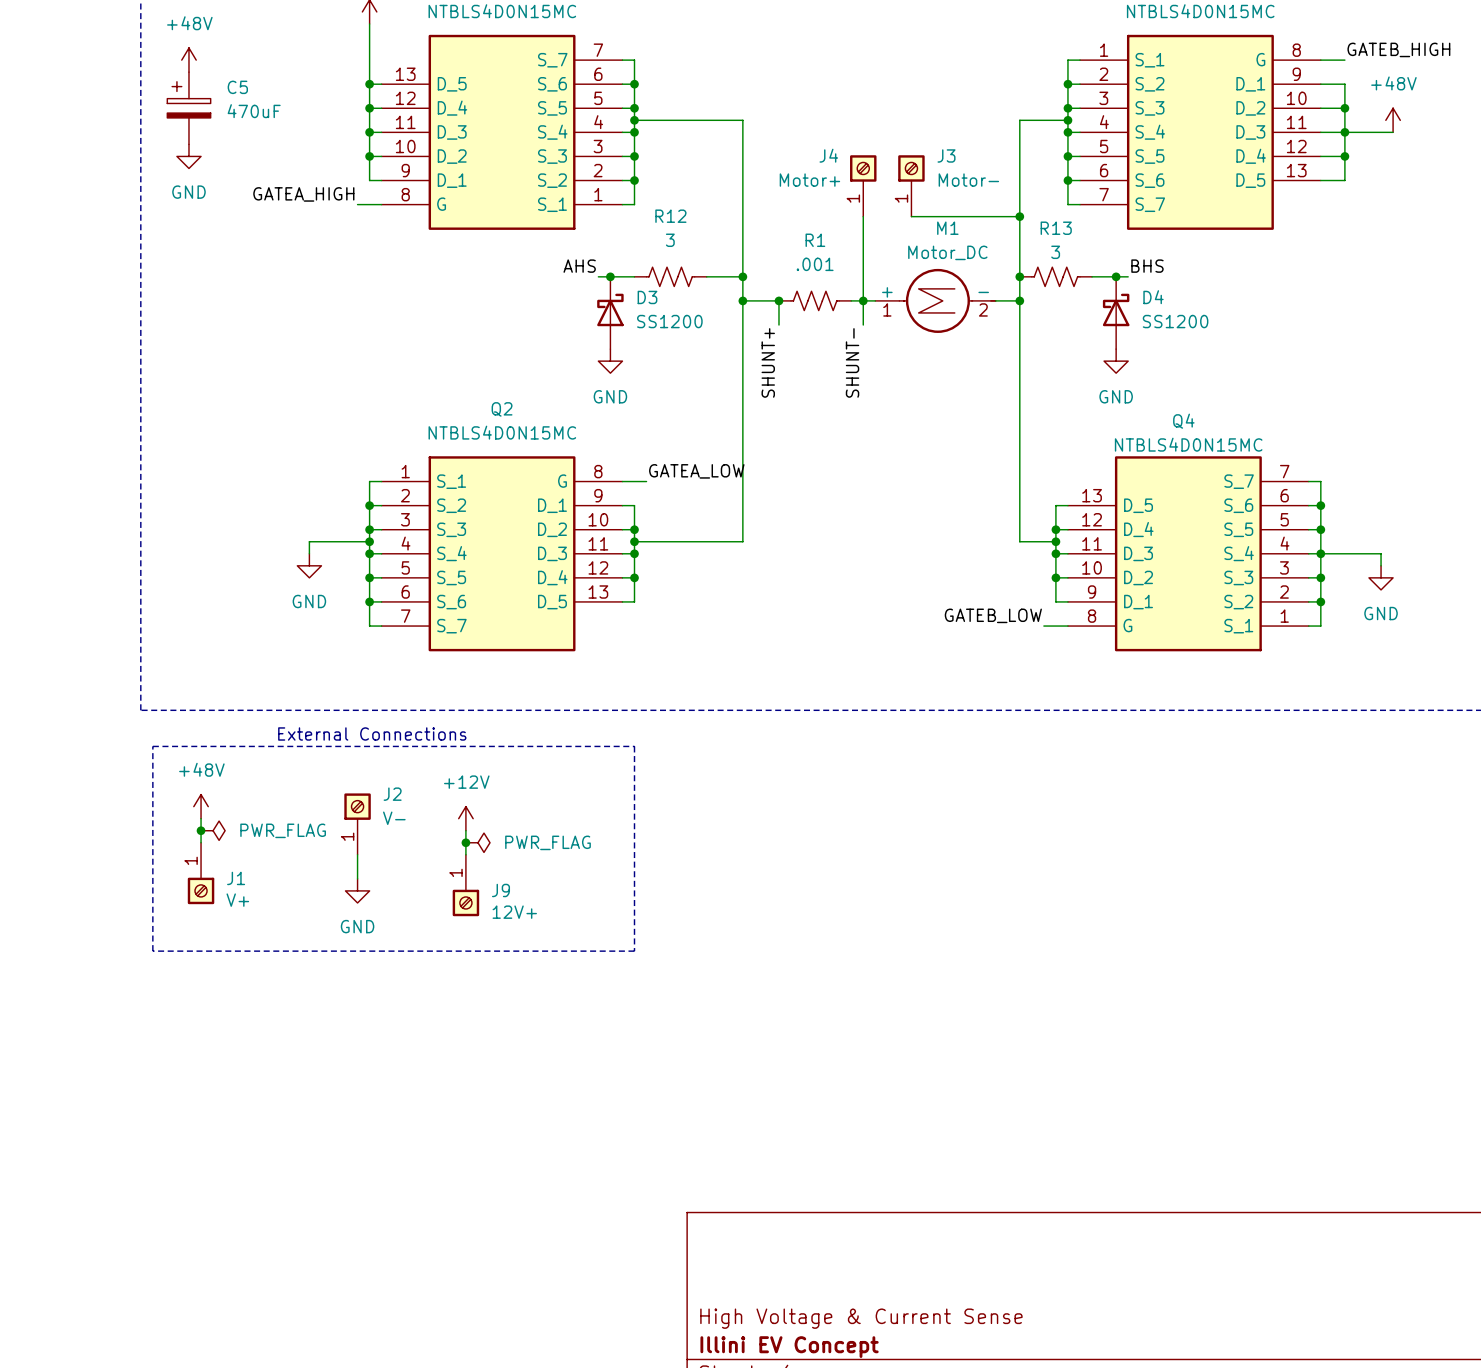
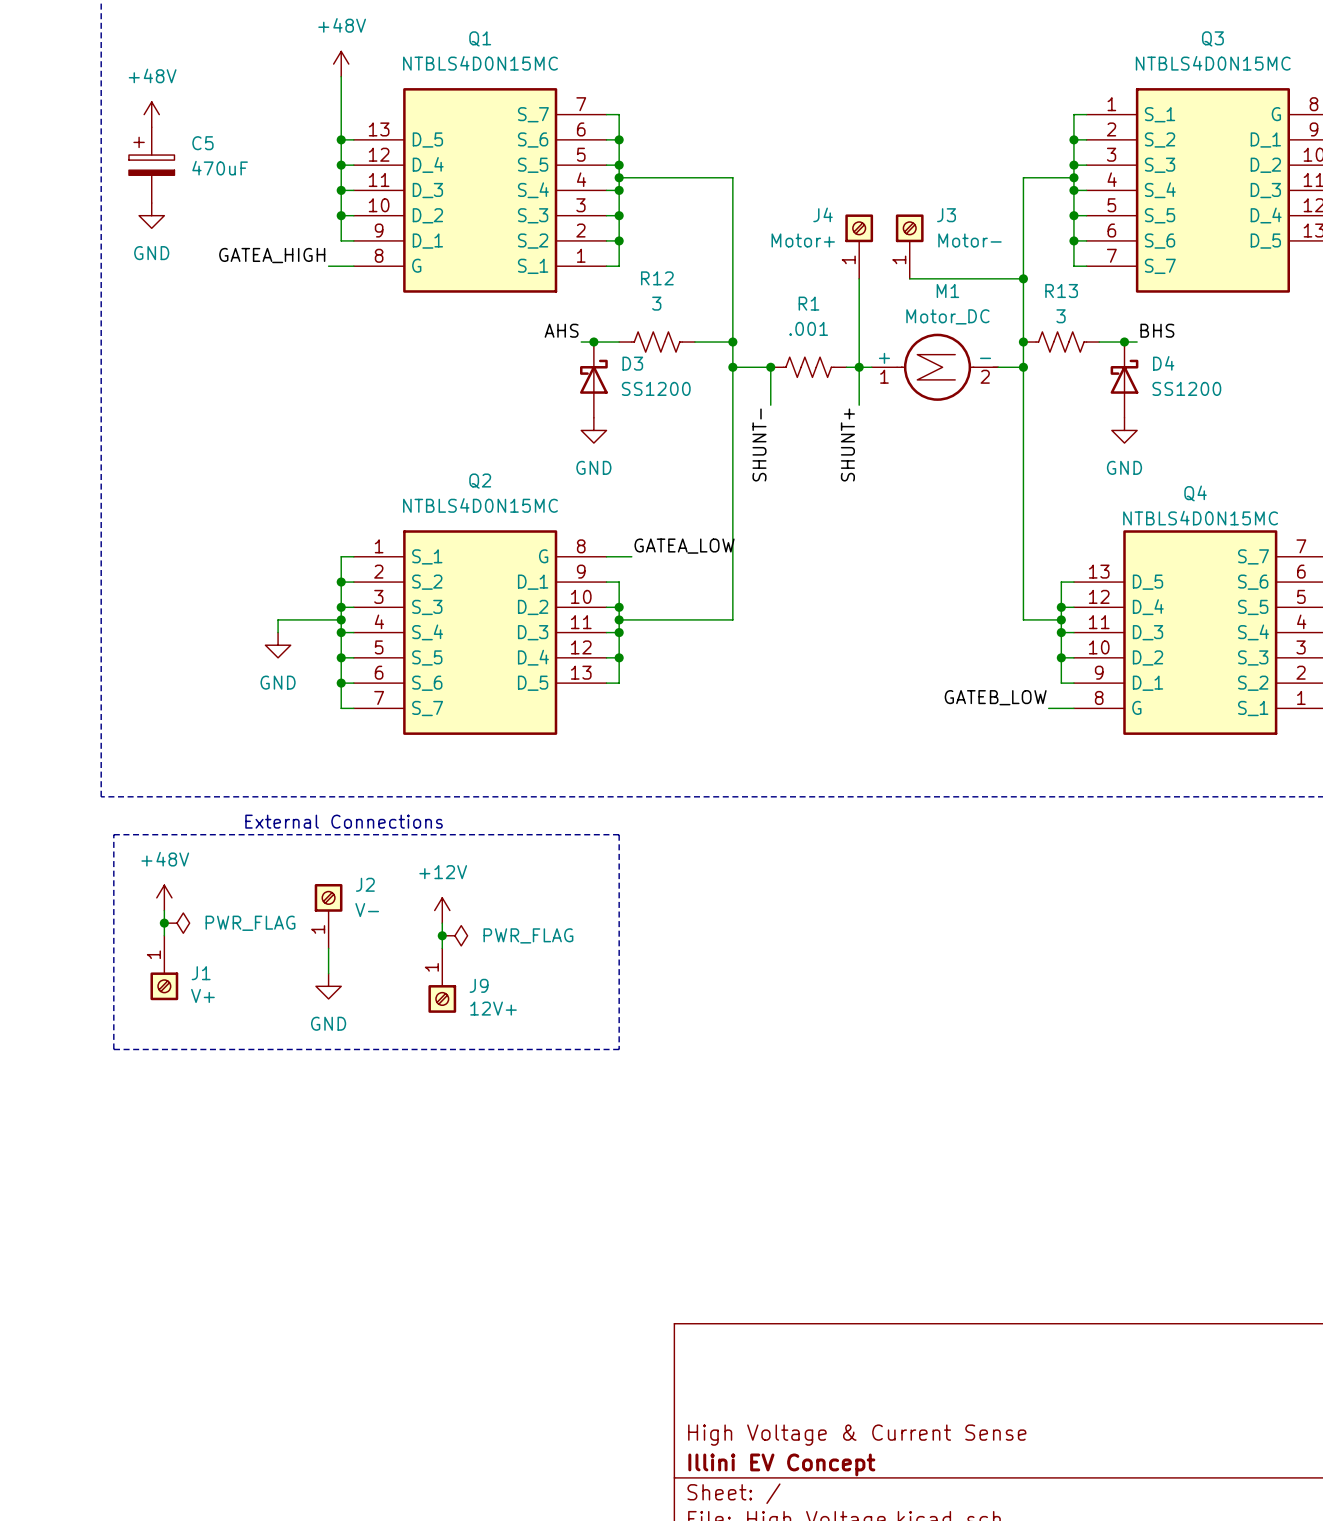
wire: none -> (770, 392) (770, 405)
wire: none -> (859, 392) (859, 405)
label position: SHUNT+ (768, 362) -> SHUNT+ (847, 444)
label position: SHUNT- (852, 362) -> SHUNT- (759, 444)

